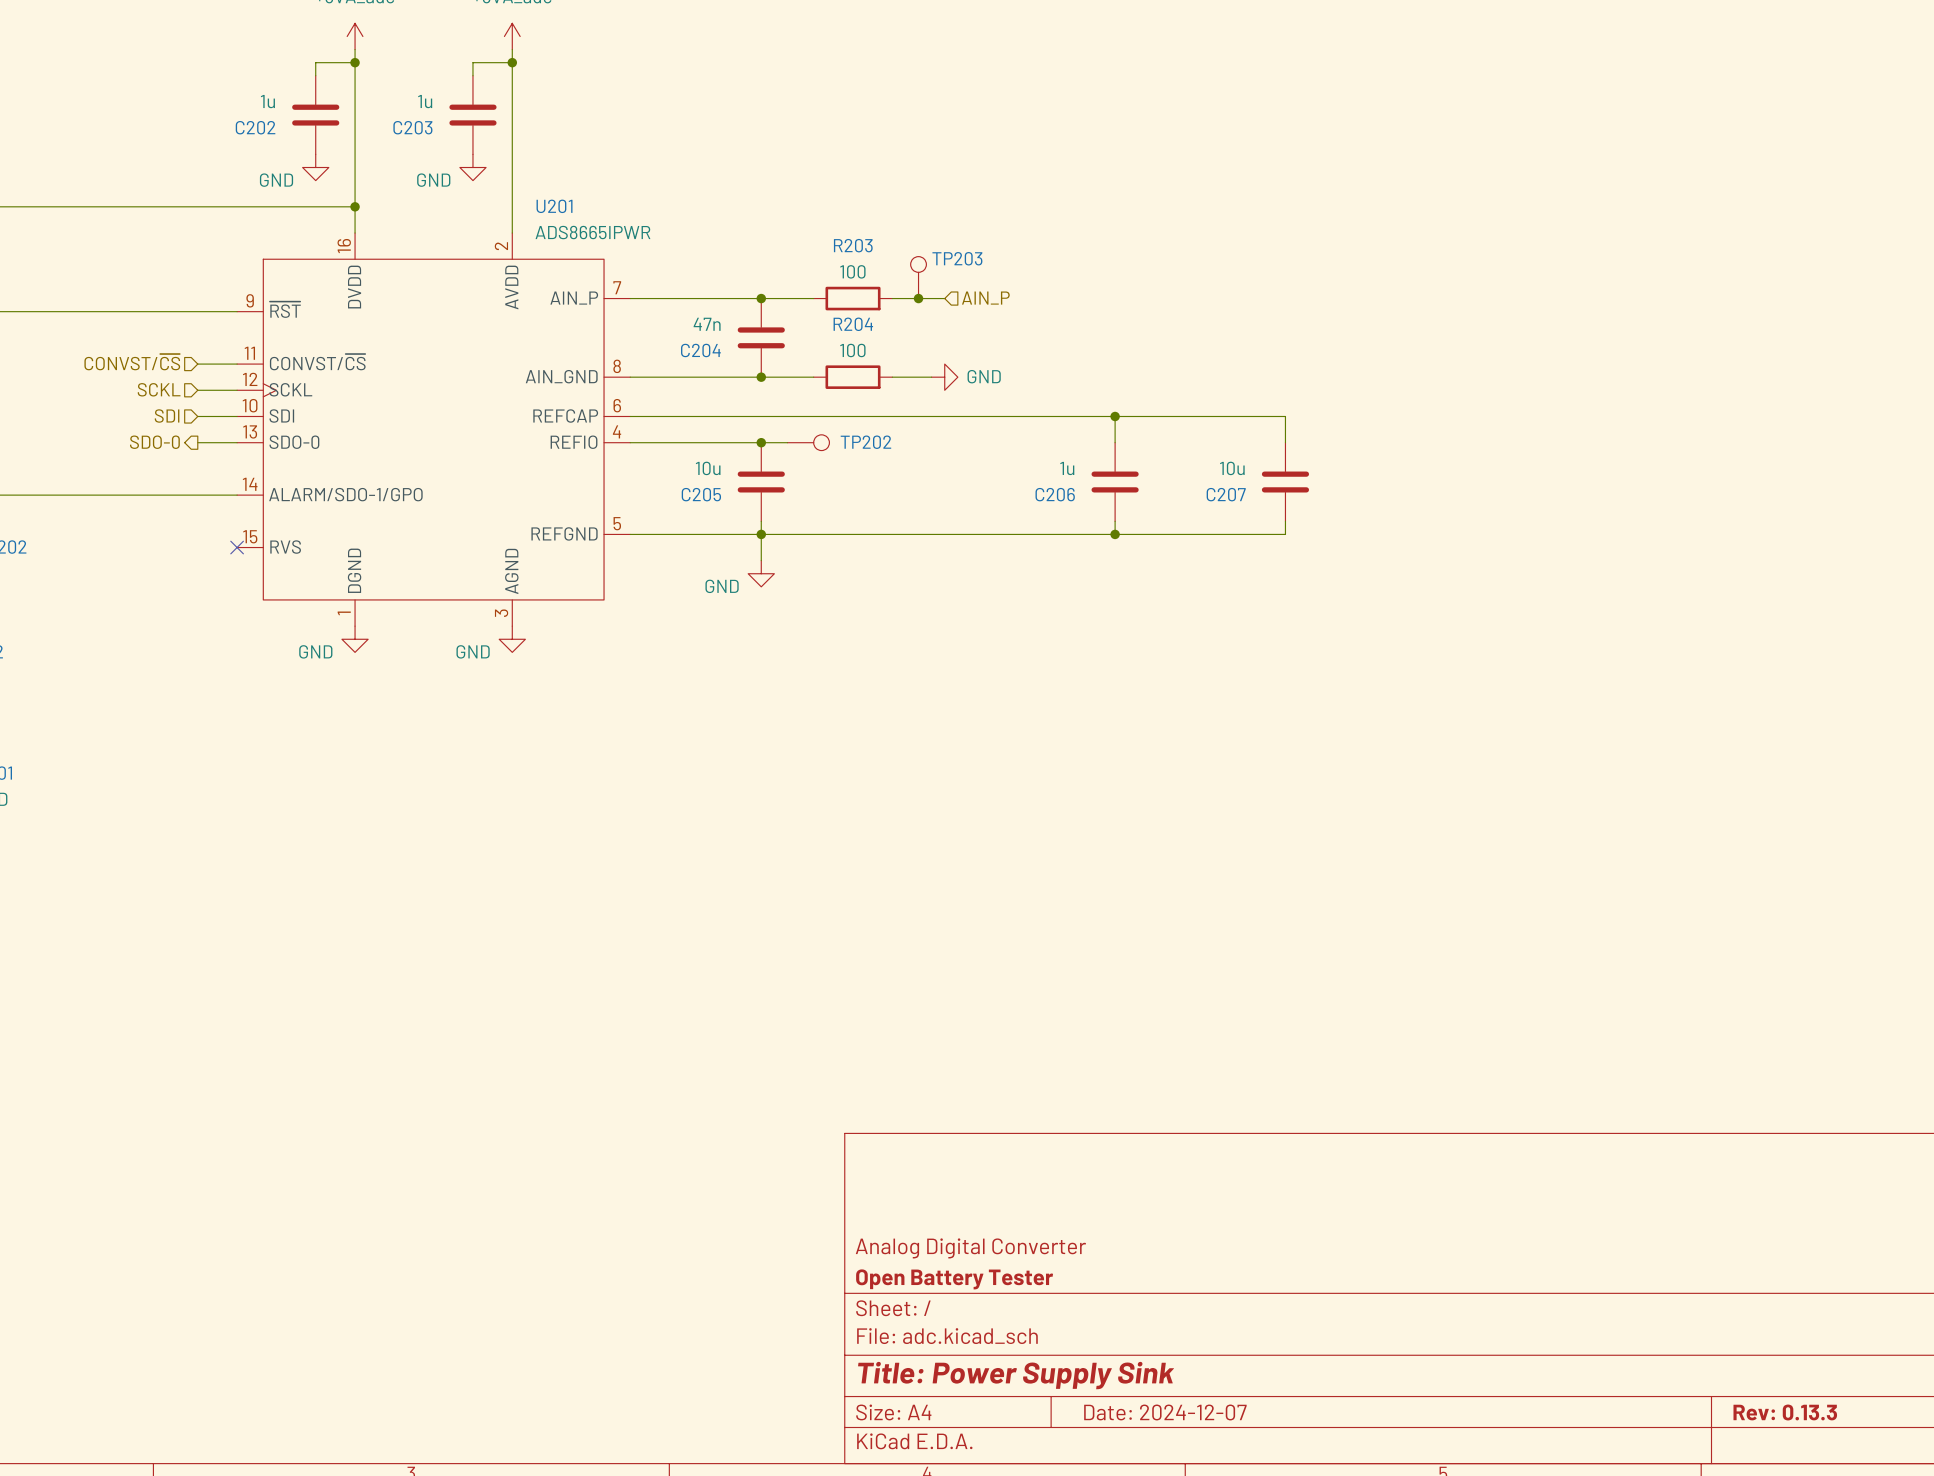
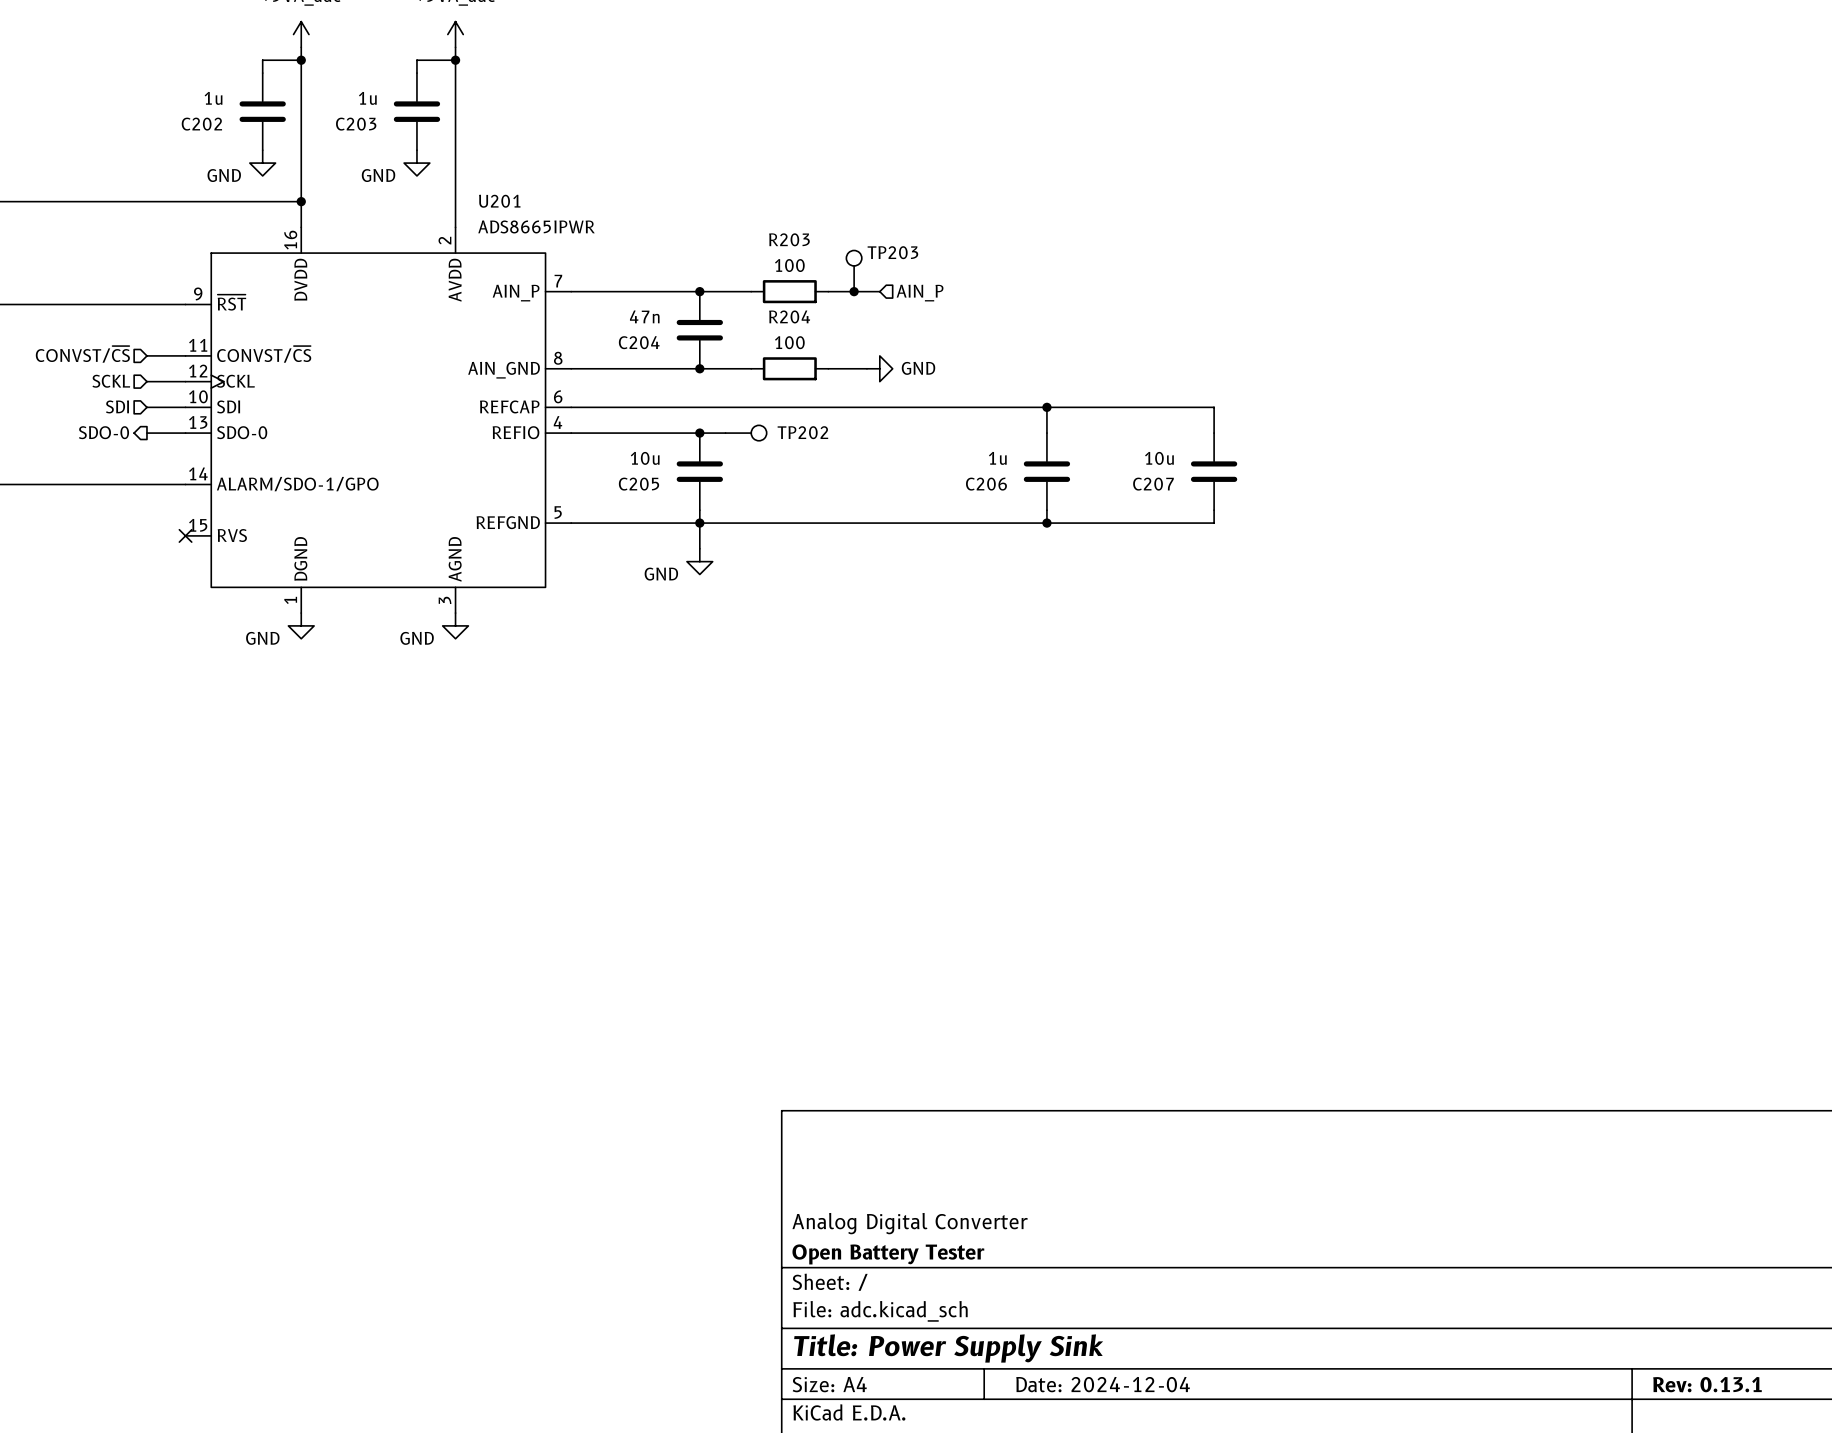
title block: Date: 2024-12-07 (1165, 1412) -> Date: 2024-12-04 (1103, 1384)
title block: Rev: 0.13.3 (1785, 1412) -> Rev: 0.13.1 (1707, 1384)

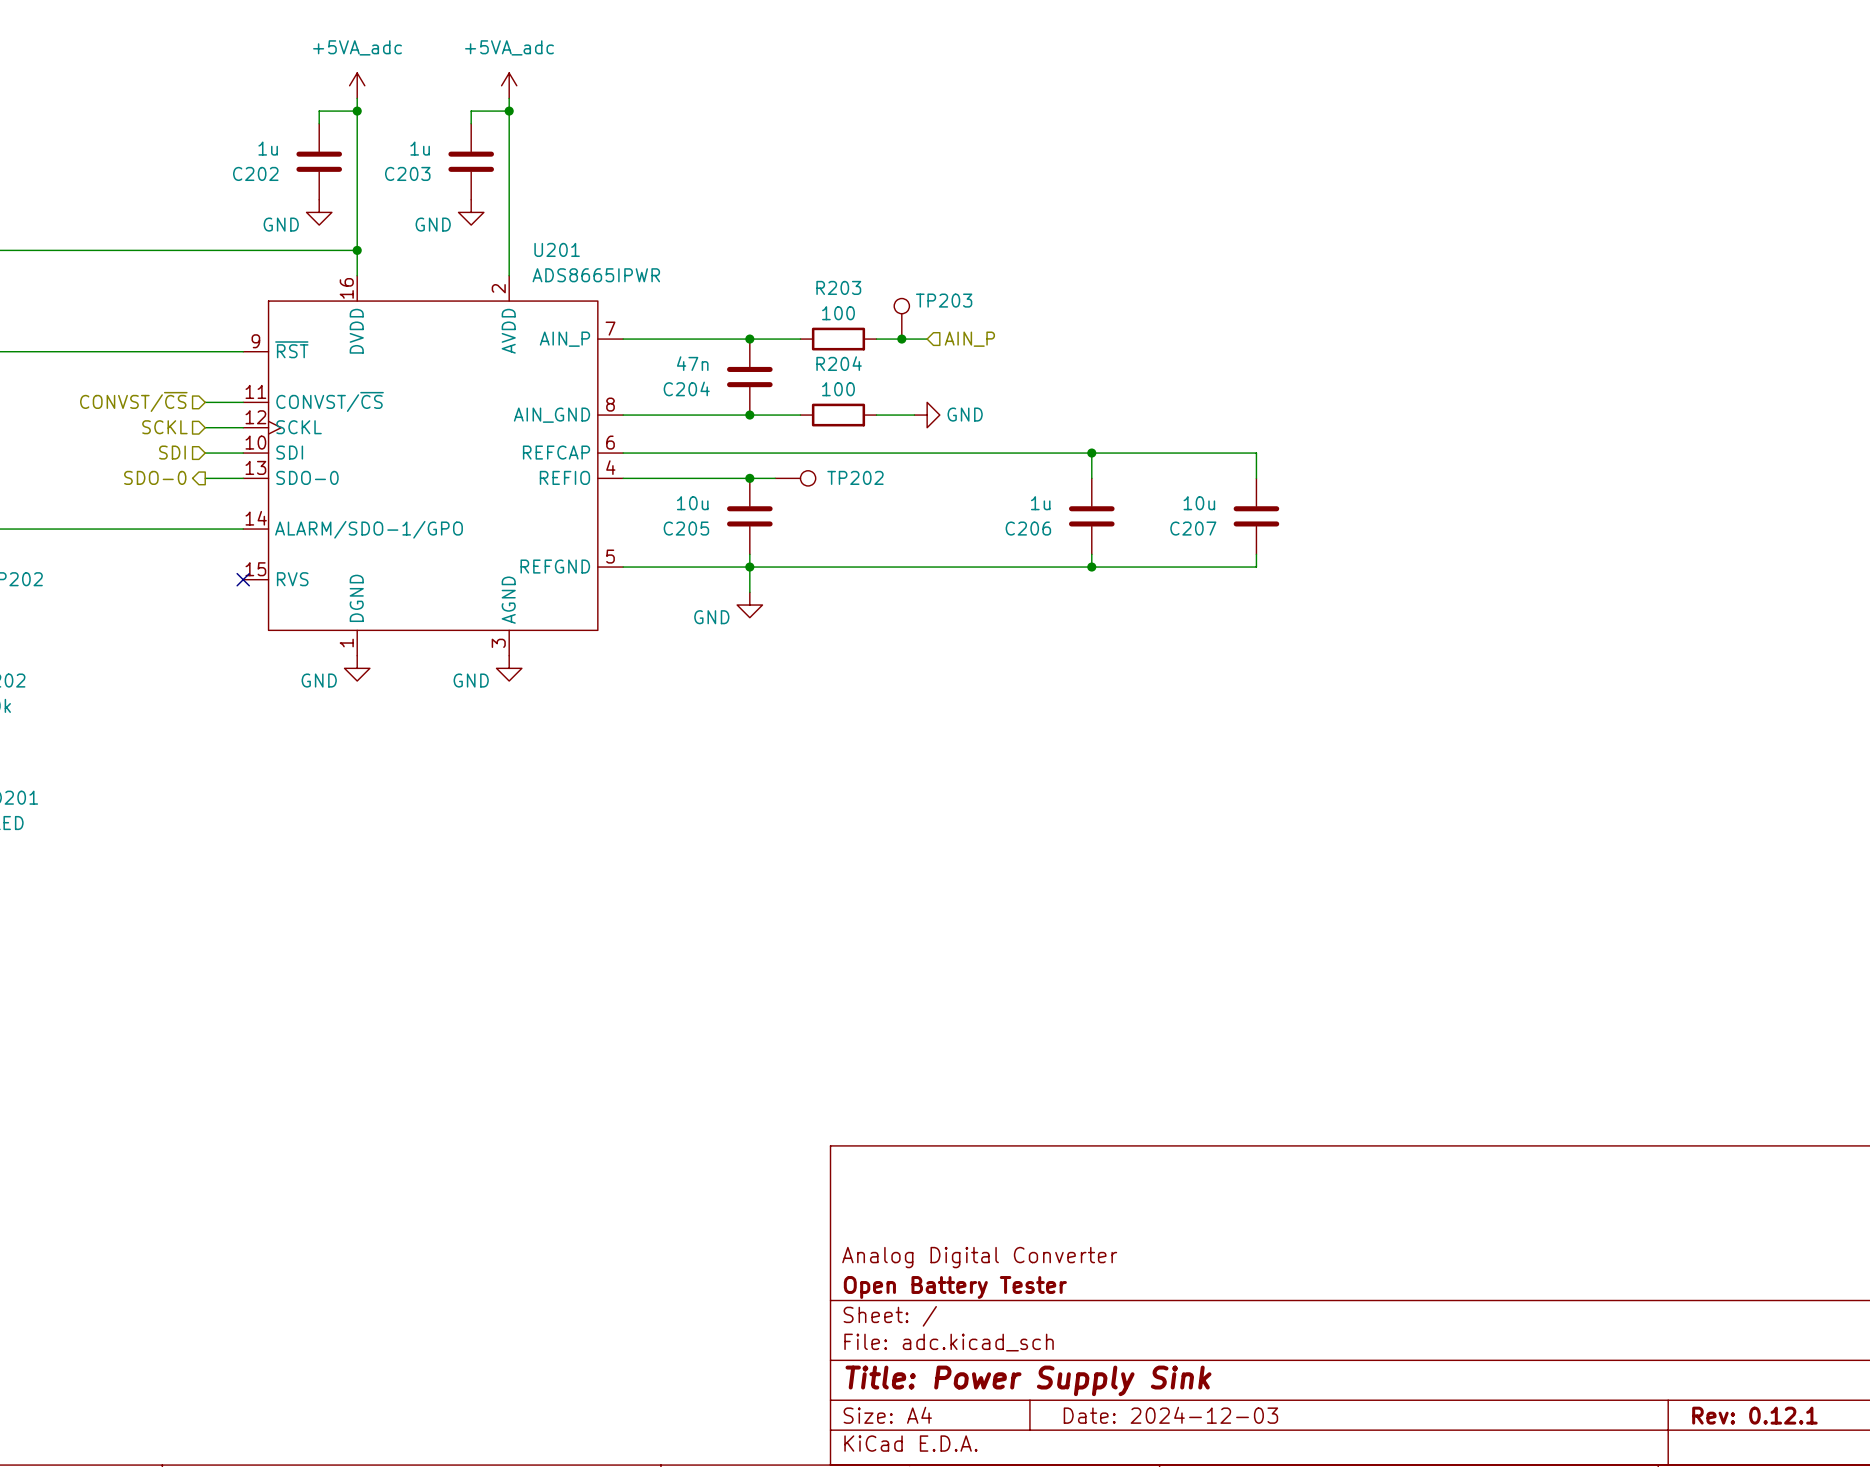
title block: Date: 2024-12-04 (1103, 1384) -> Date: 2024-12-03 (1170, 1415)
title block: Rev: 0.13.1 (1707, 1384) -> Rev: 0.12.1 (1754, 1415)

